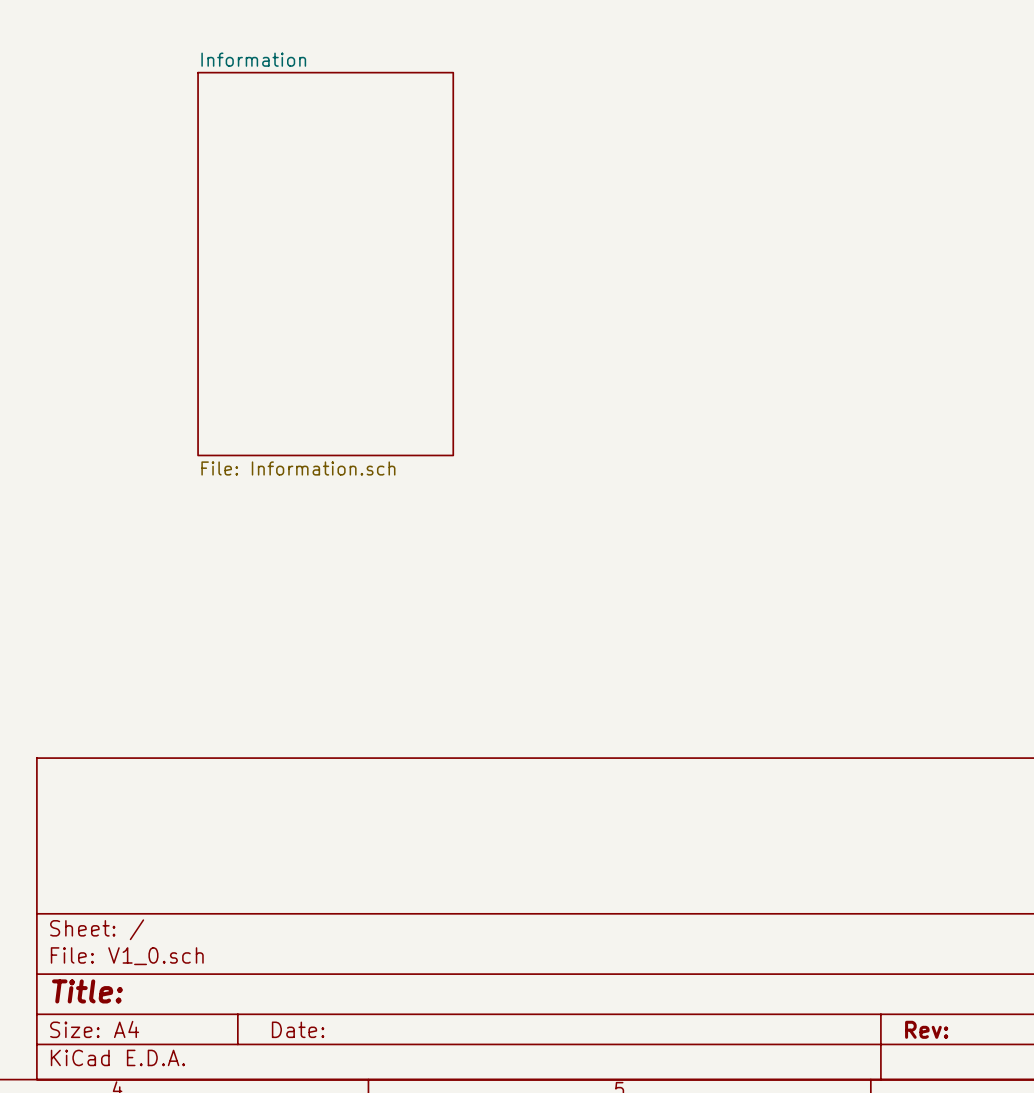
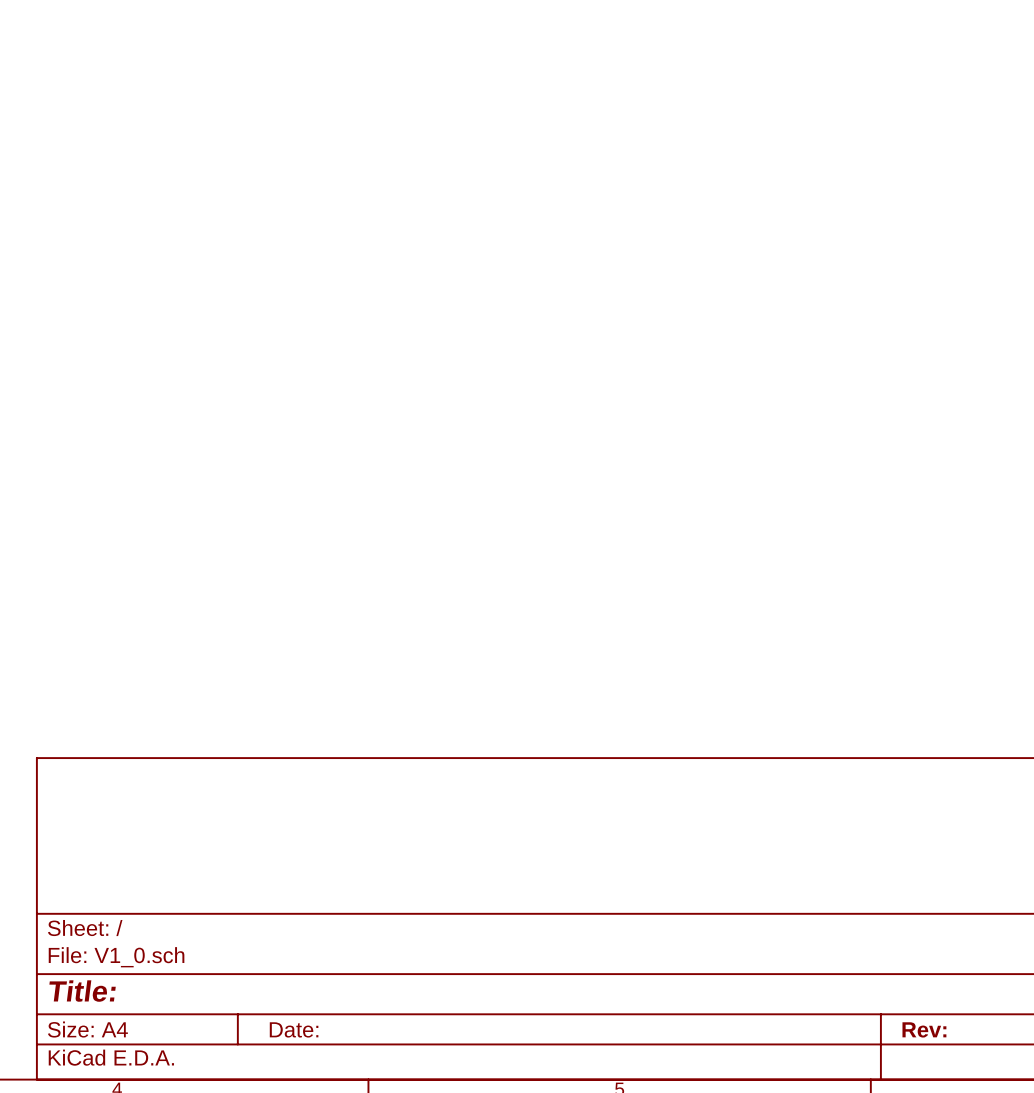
sheet Information: File: Information.sch (325, 264) -> none

